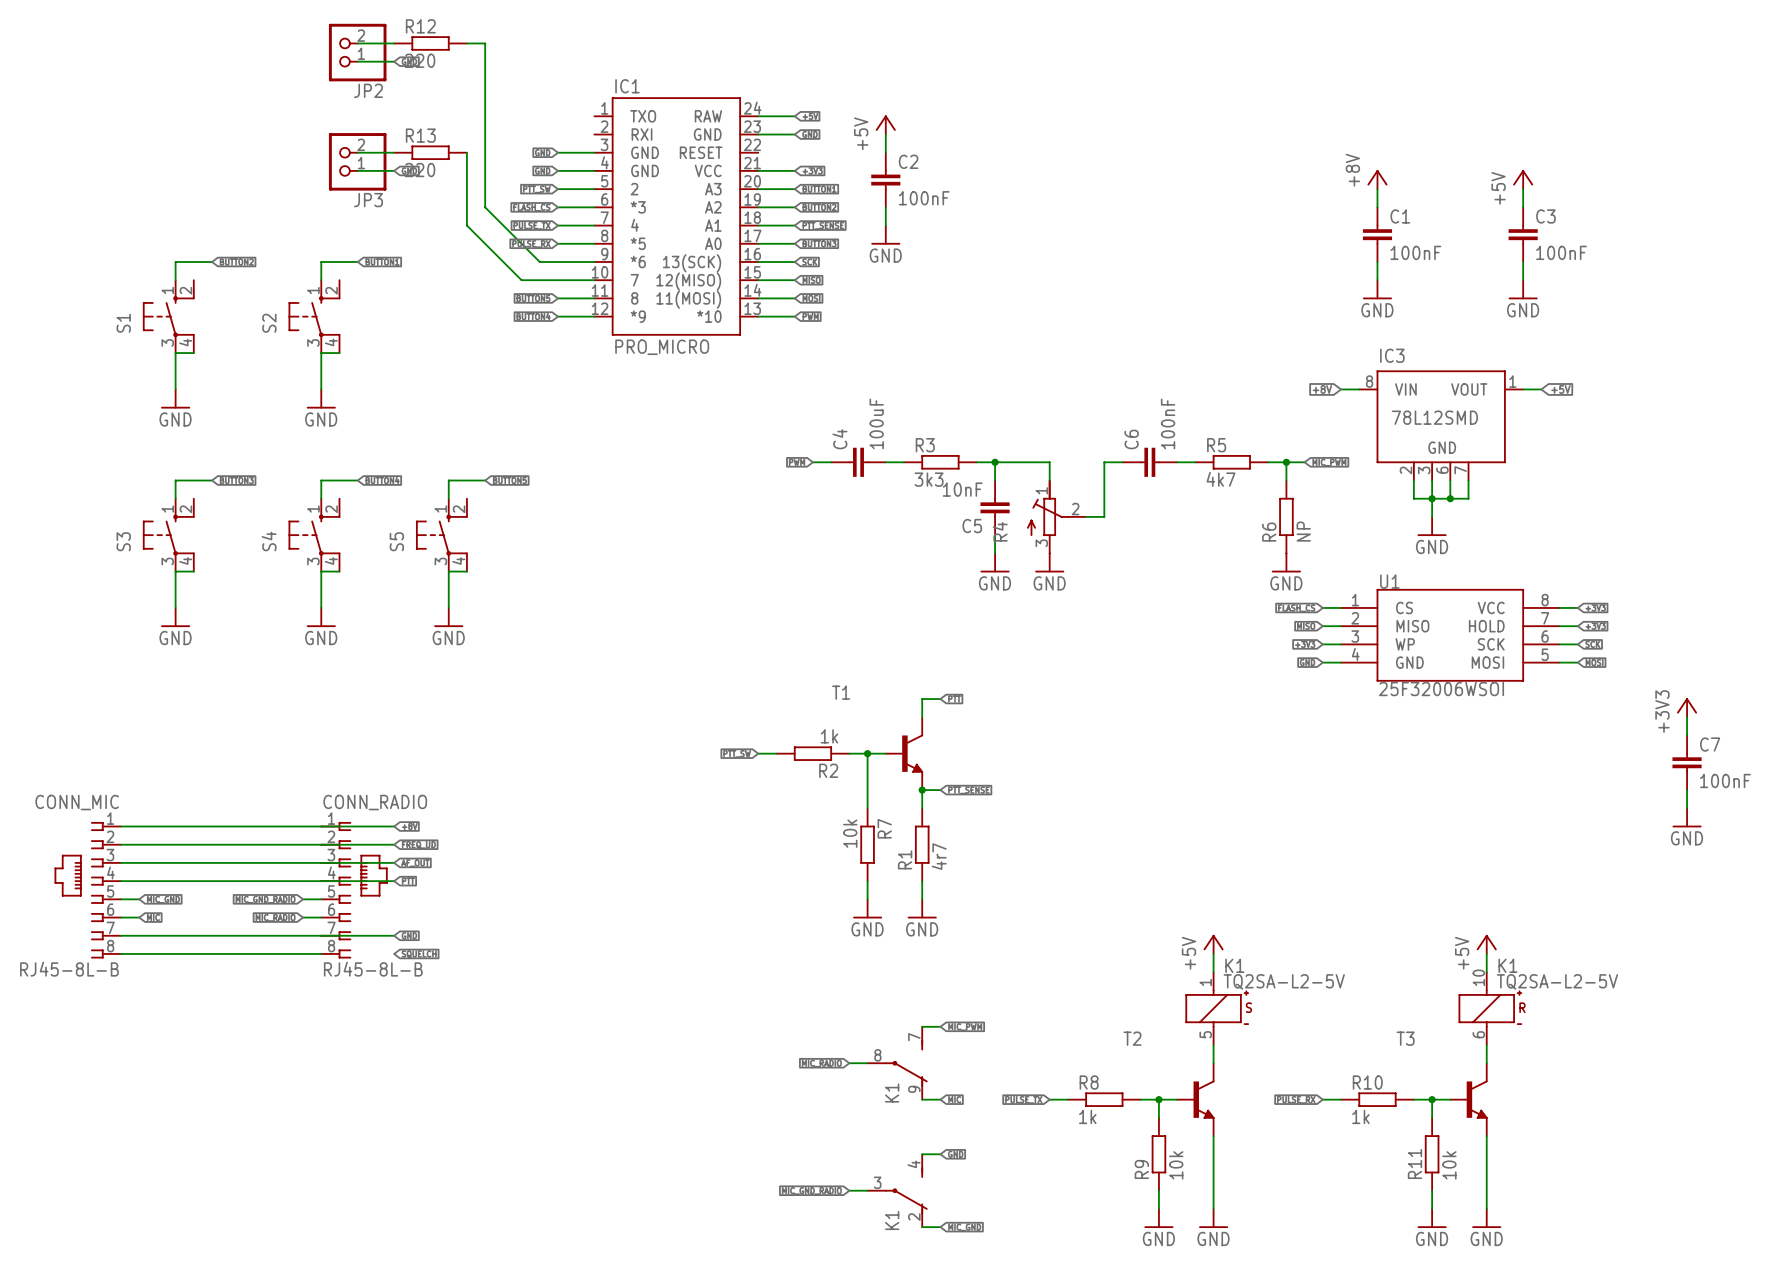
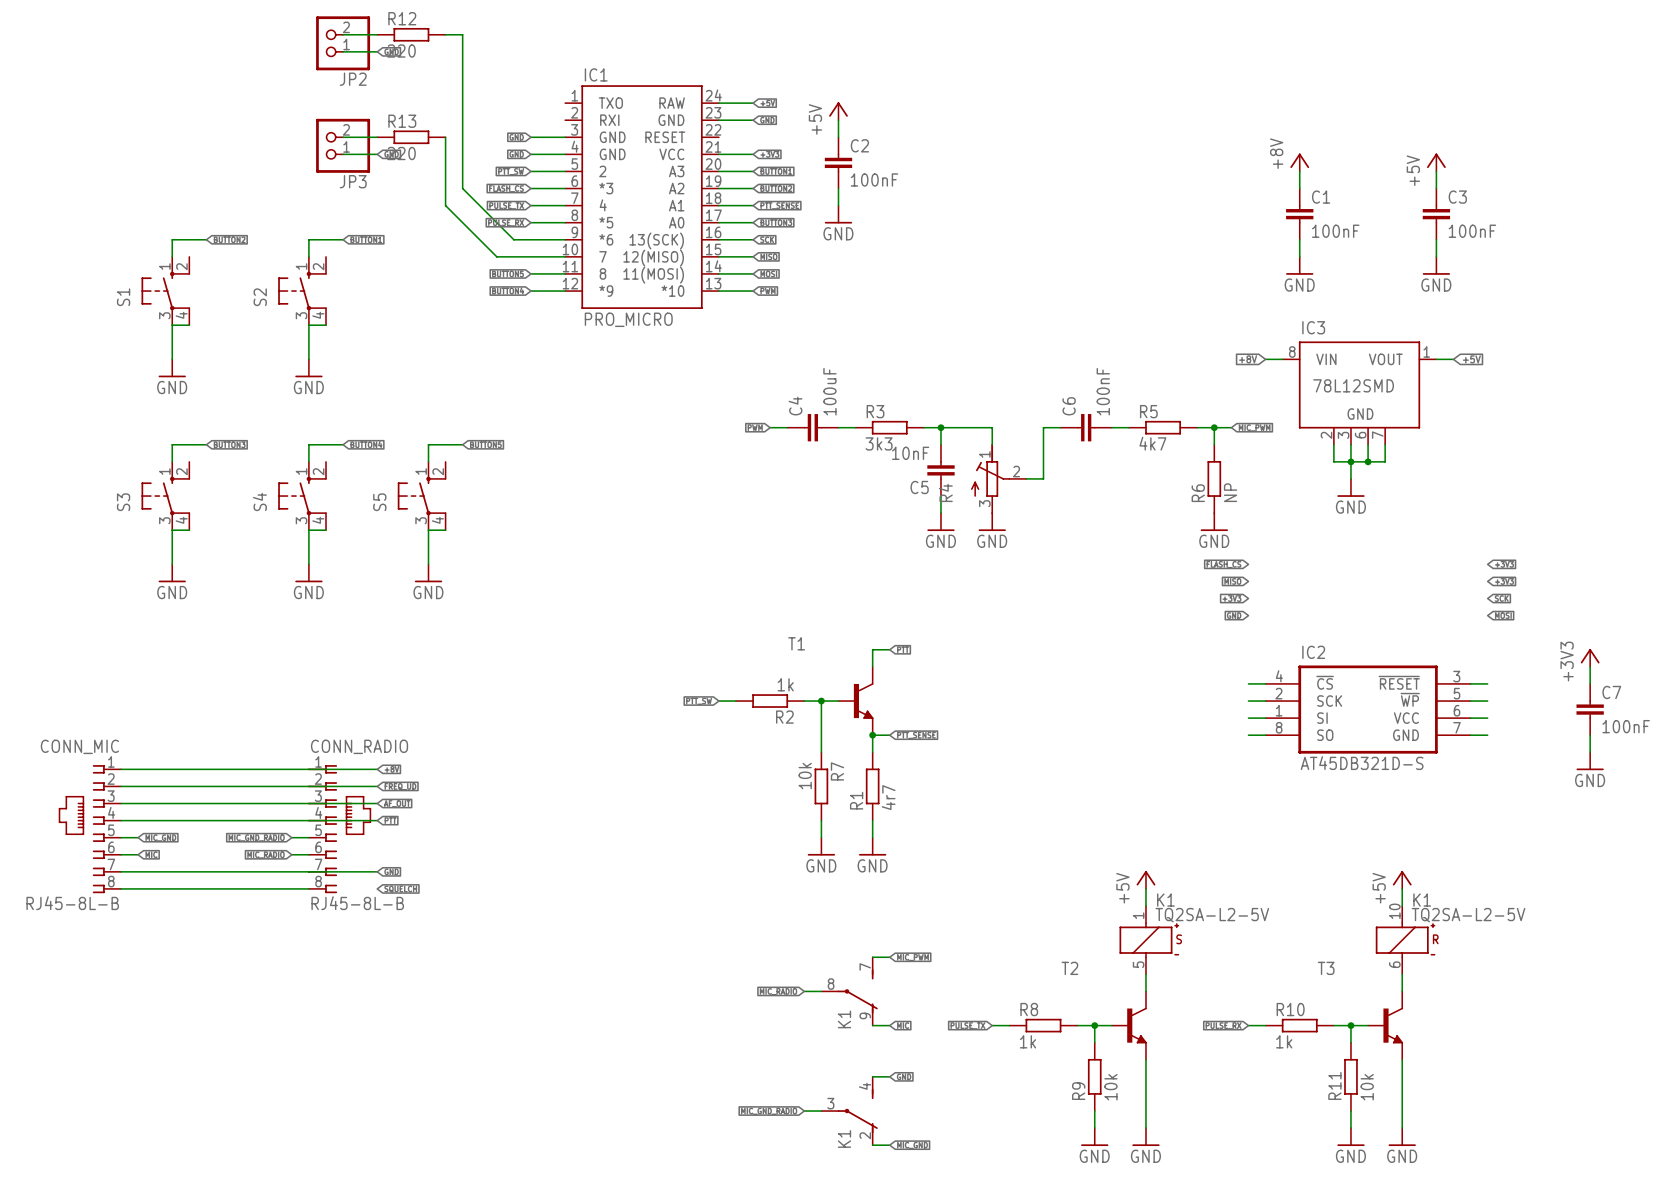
wire: (1322, 607) (1341, 607) -> (1248, 683) (1265, 683)
wire: (1559, 607) (1577, 607) -> (1470, 683) (1487, 683)
wire: (1322, 626) (1341, 626) -> (1248, 701) (1265, 701)
wire: (1559, 626) (1577, 626) -> (1470, 701) (1487, 701)
U1: 25F32006WSOI (1450, 635) -> none
wire: (1322, 644) (1341, 644) -> (1248, 718) (1265, 718)
wire: (1559, 644) (1577, 644) -> (1470, 718) (1487, 718)
wire: (1322, 662) (1341, 662) -> (1248, 735) (1265, 735)
wire: (1559, 662) (1577, 662) -> (1470, 735) (1487, 735)
IC2: none -> AT45DB321D-S (1368, 709)

